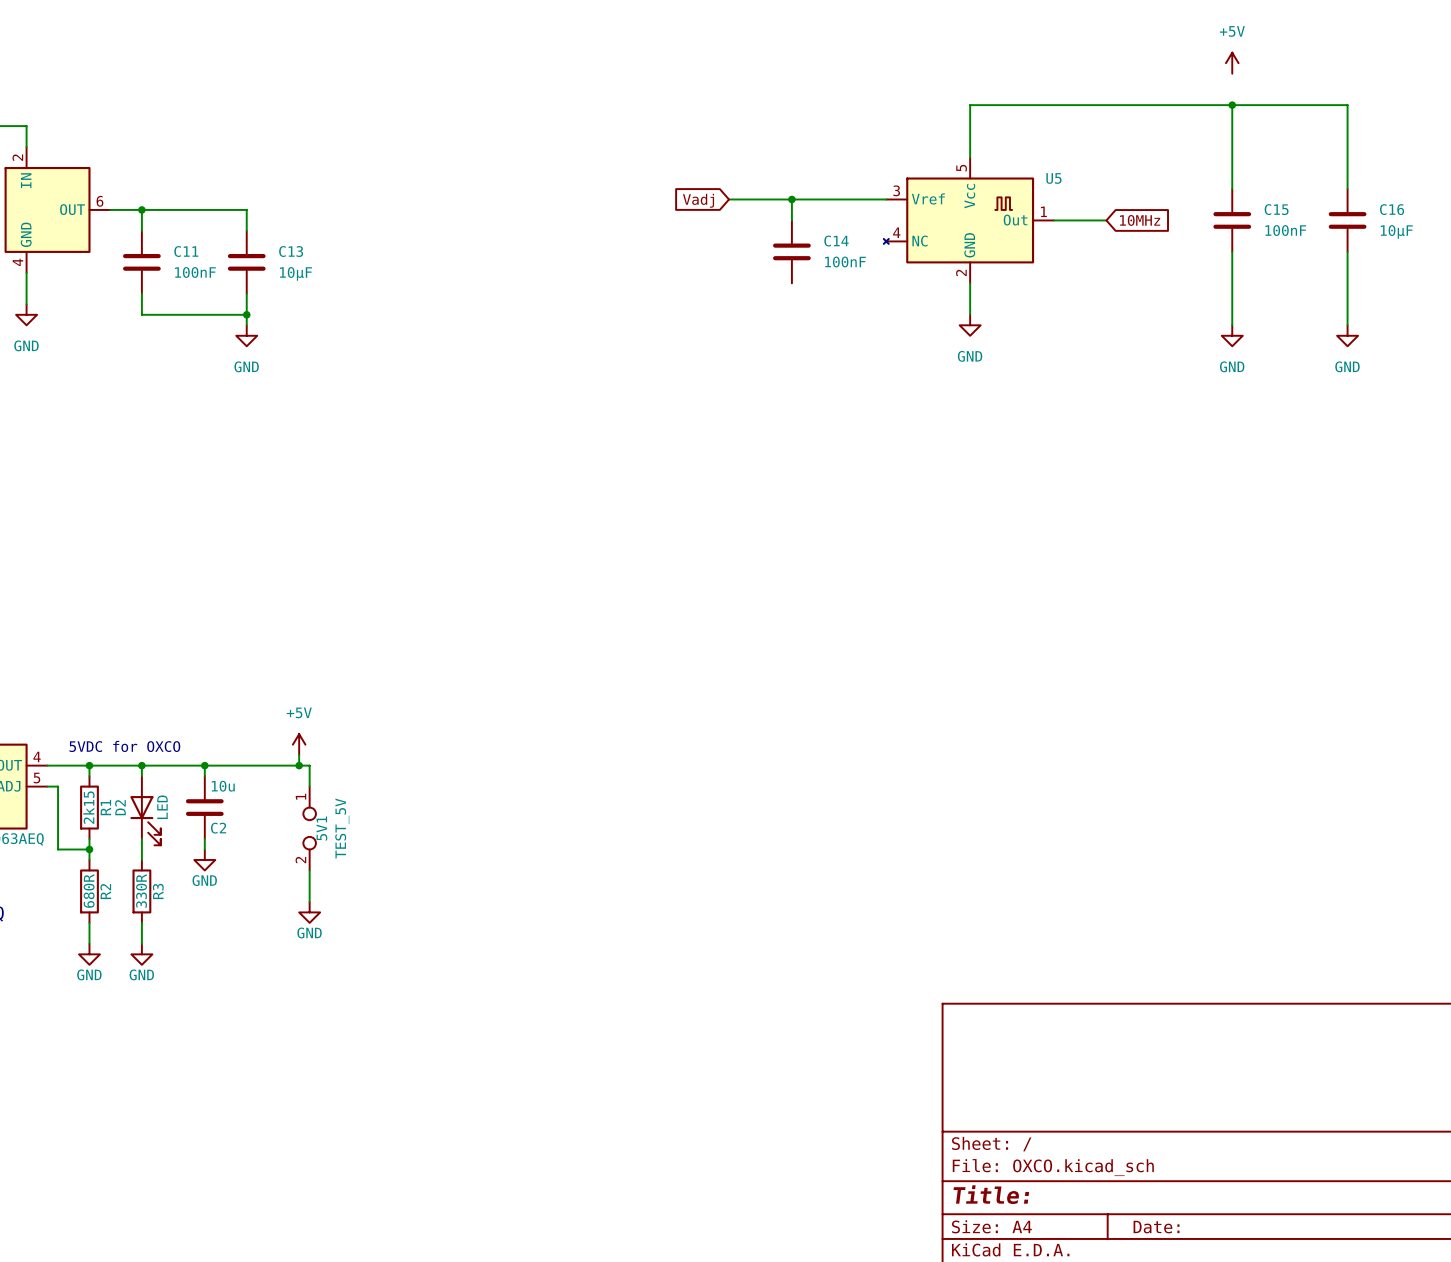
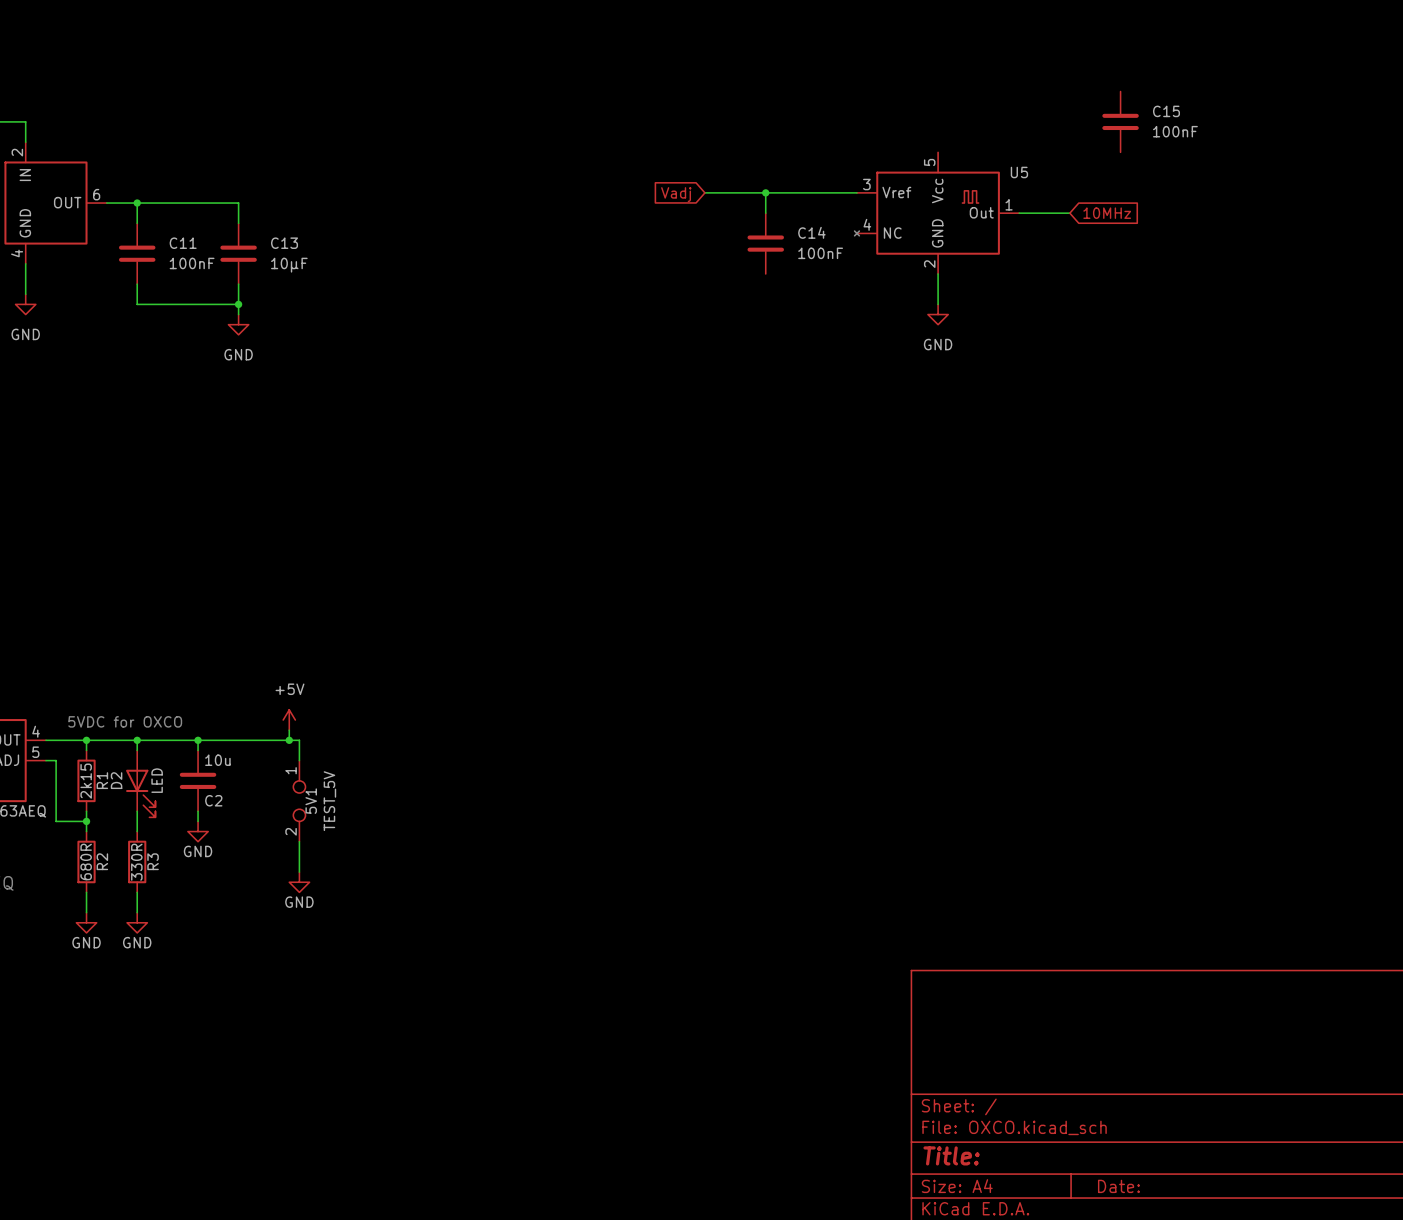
power symbol: +5V (1232, 63) -> none
wire: (1232, 105) (1232, 189) -> none
junction: (1232, 105) -> none
wire: (970, 157) (970, 105) (1347, 105) (1347, 189) -> none
C15 position: (1232, 220) -> (1120, 121)
C16: 10µF (1347, 220) -> none
wire: (1232, 251) (1232, 325) -> none
wire: (1347, 251) (1347, 325) -> none
power symbol: GND (1232, 335) -> none
power symbol: GND (1347, 335) -> none

